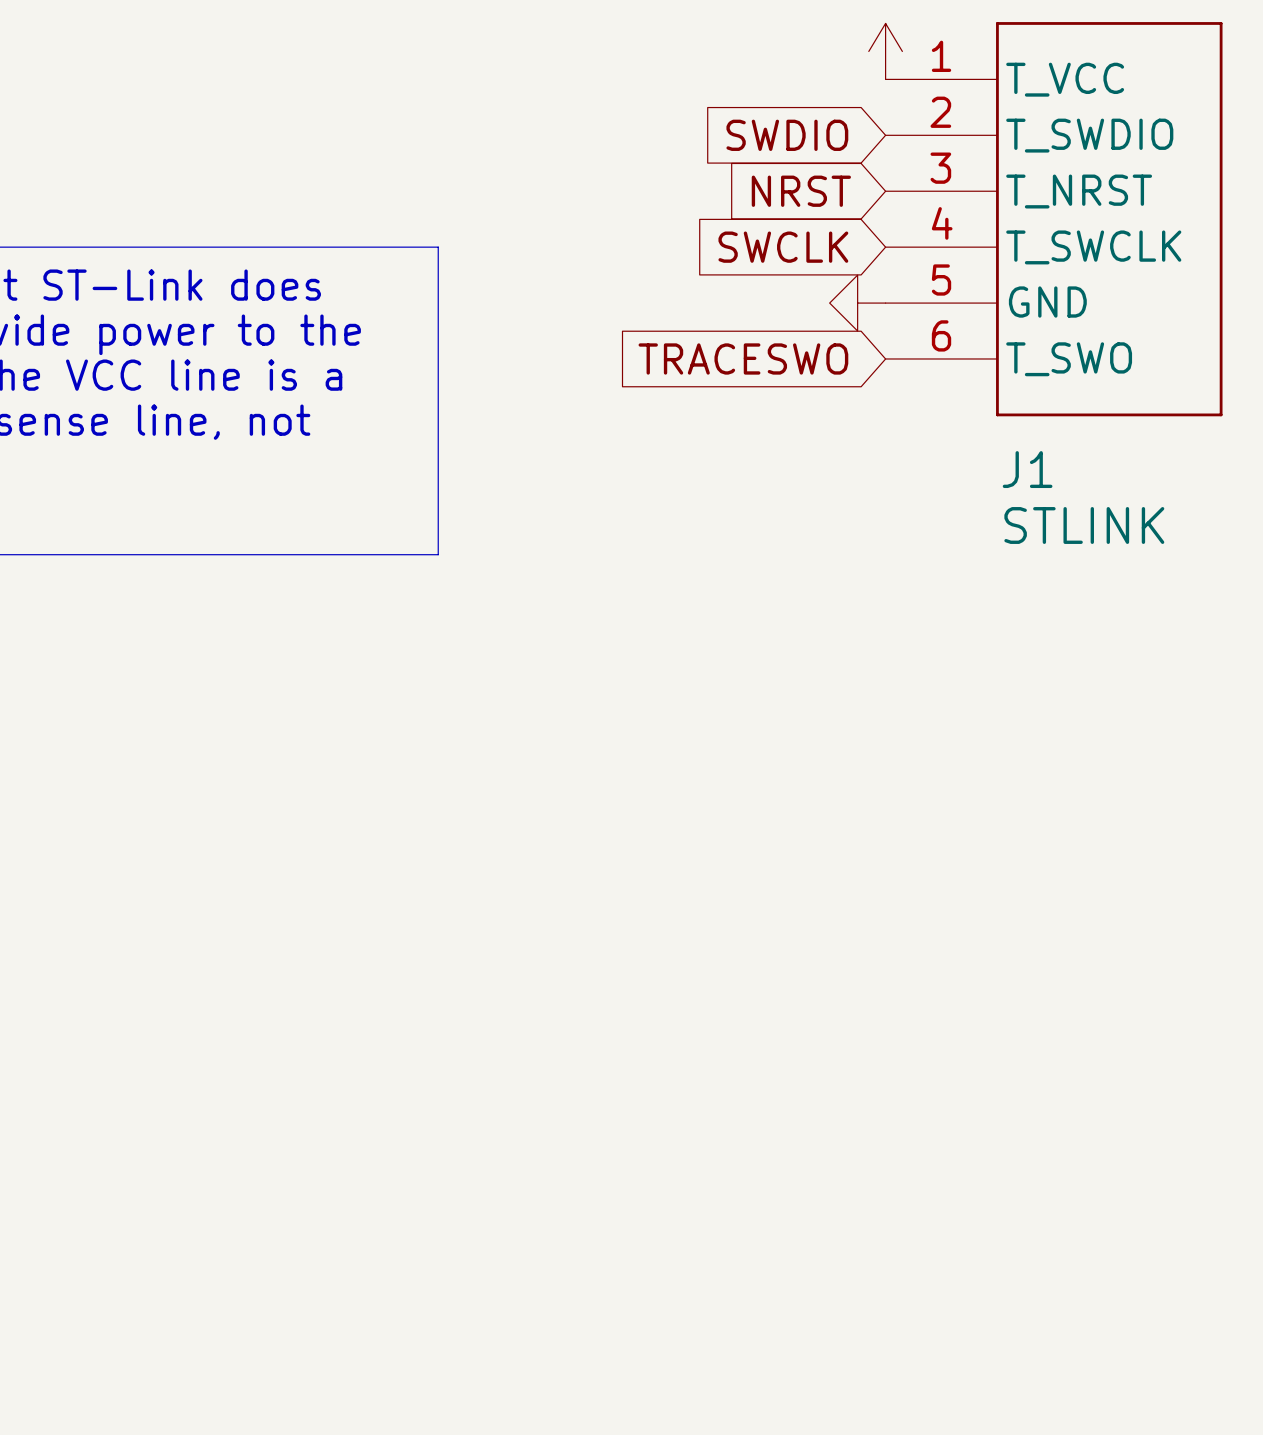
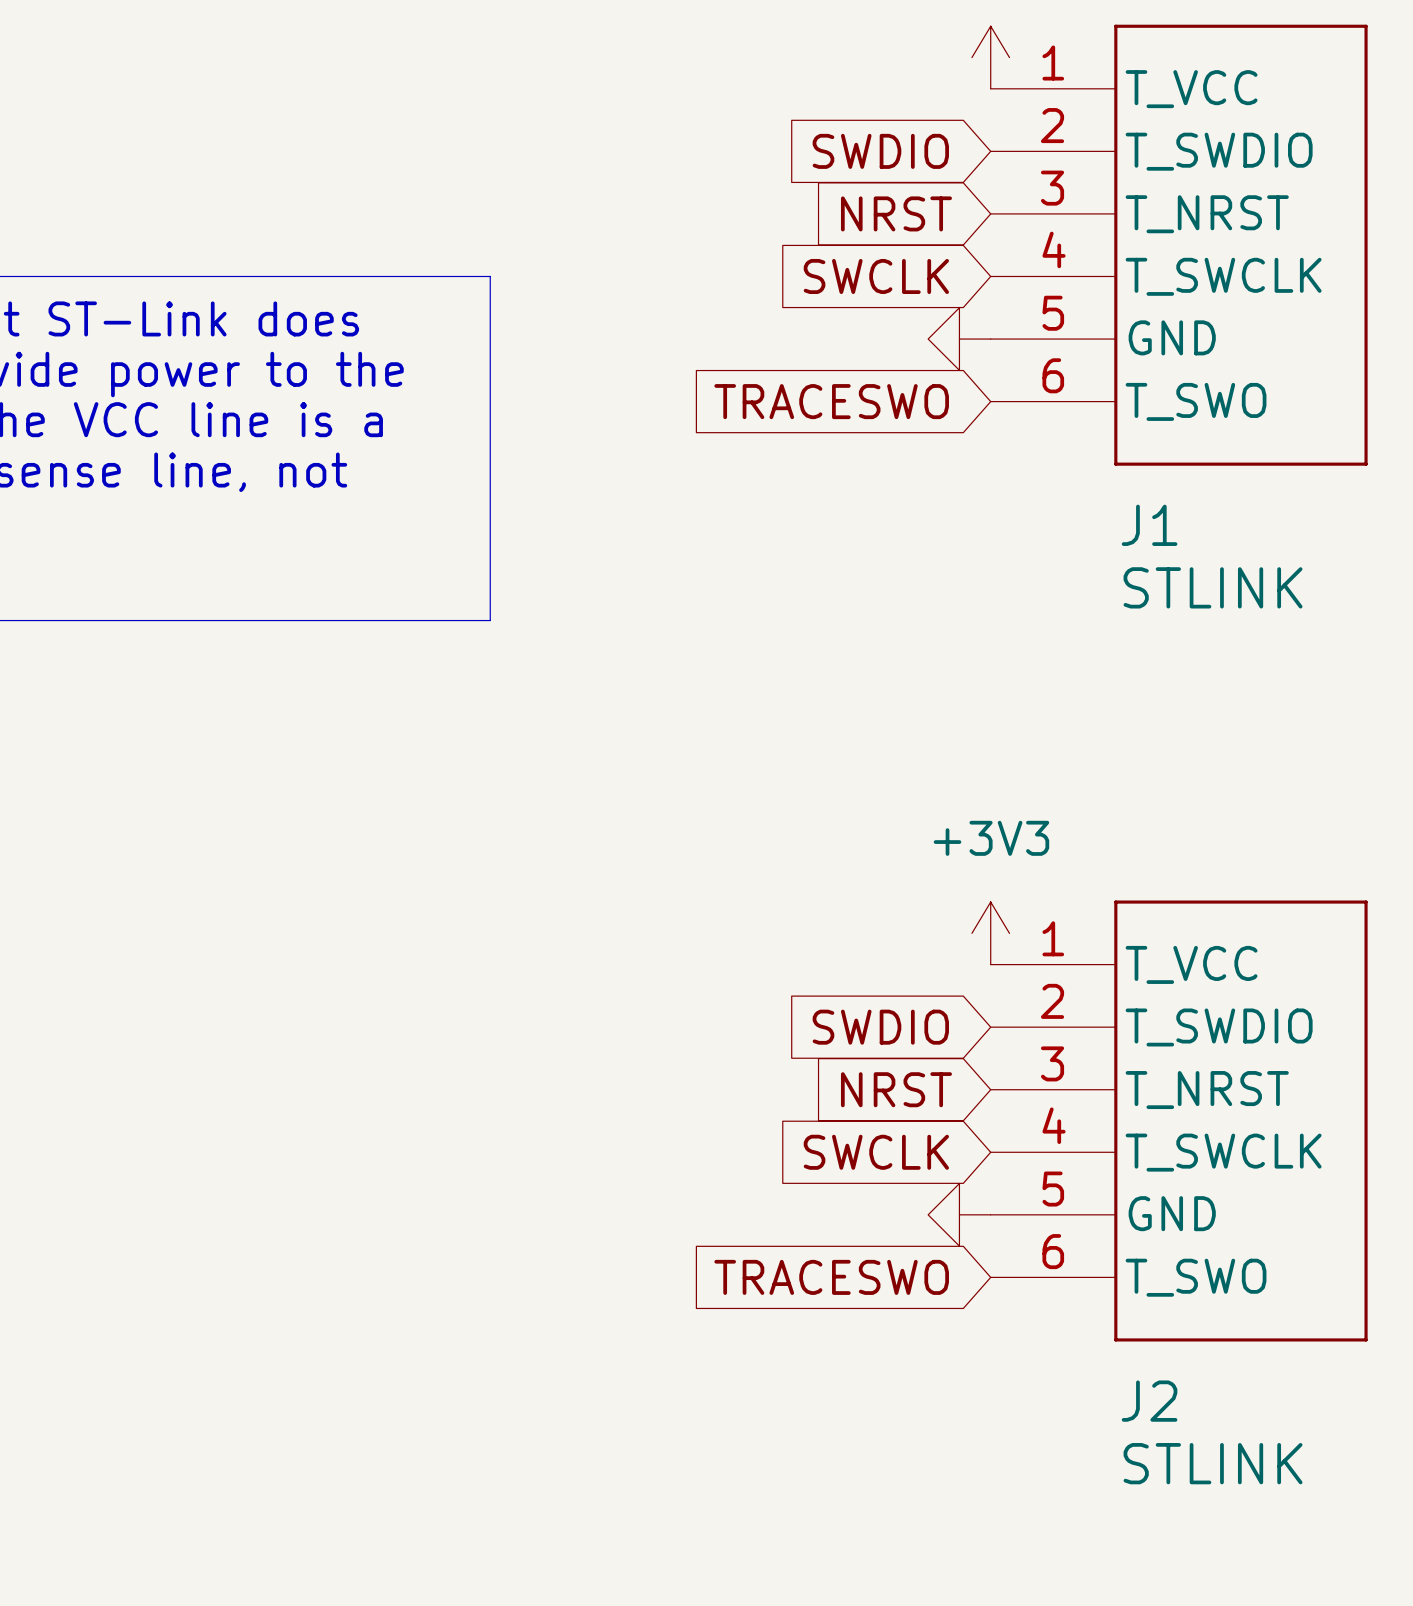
power symbol: none -> +3V3 (990, 933)
global label: none -> SWDIO (880, 1027)
global label: none -> NRST (896, 1089)
J2: none -> STLINK (1179, 1121)
global label: none -> SWCLK (876, 1152)
power symbol: none -> (959, 1214)
global label: none -> TRACESWO (831, 1277)

